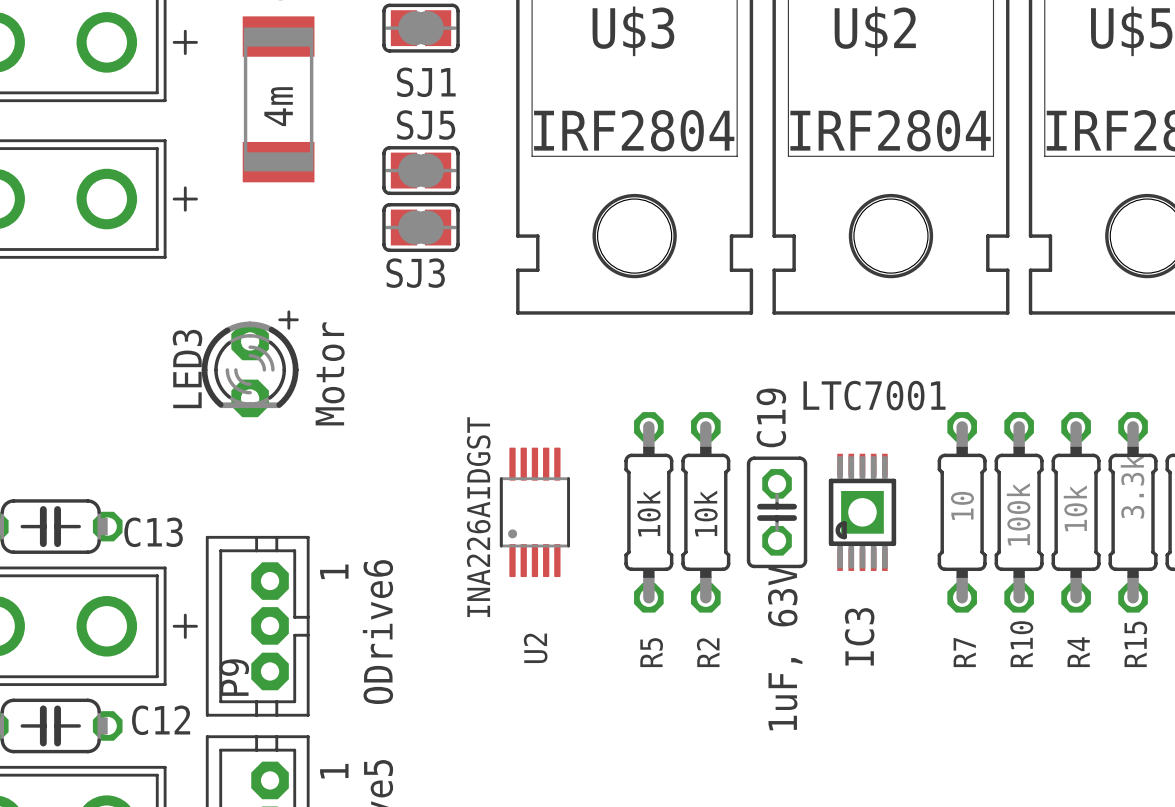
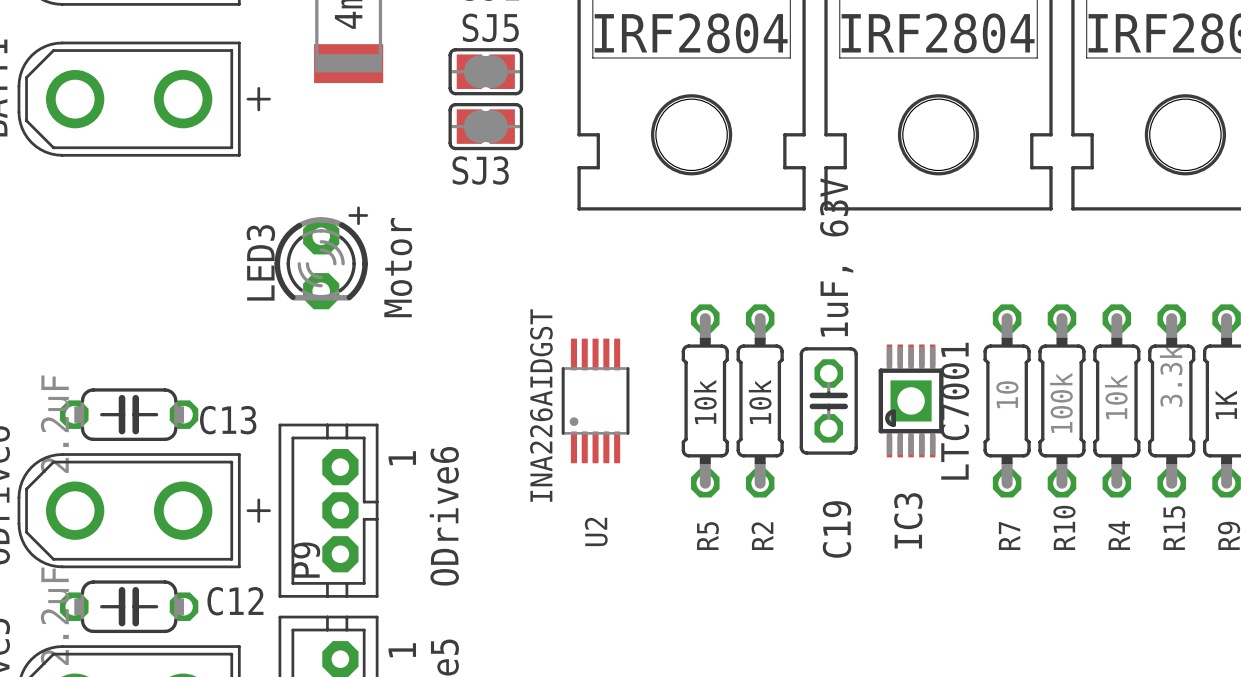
IC3 value rotation: 0° (874, 395) -> 90° counterclockwise (954, 411)
C19 name position: C19 (771, 417) -> C19 (837, 529)
C19 value position: 1uF, 63V (785, 648) -> 1uF, 63V (836, 257)

